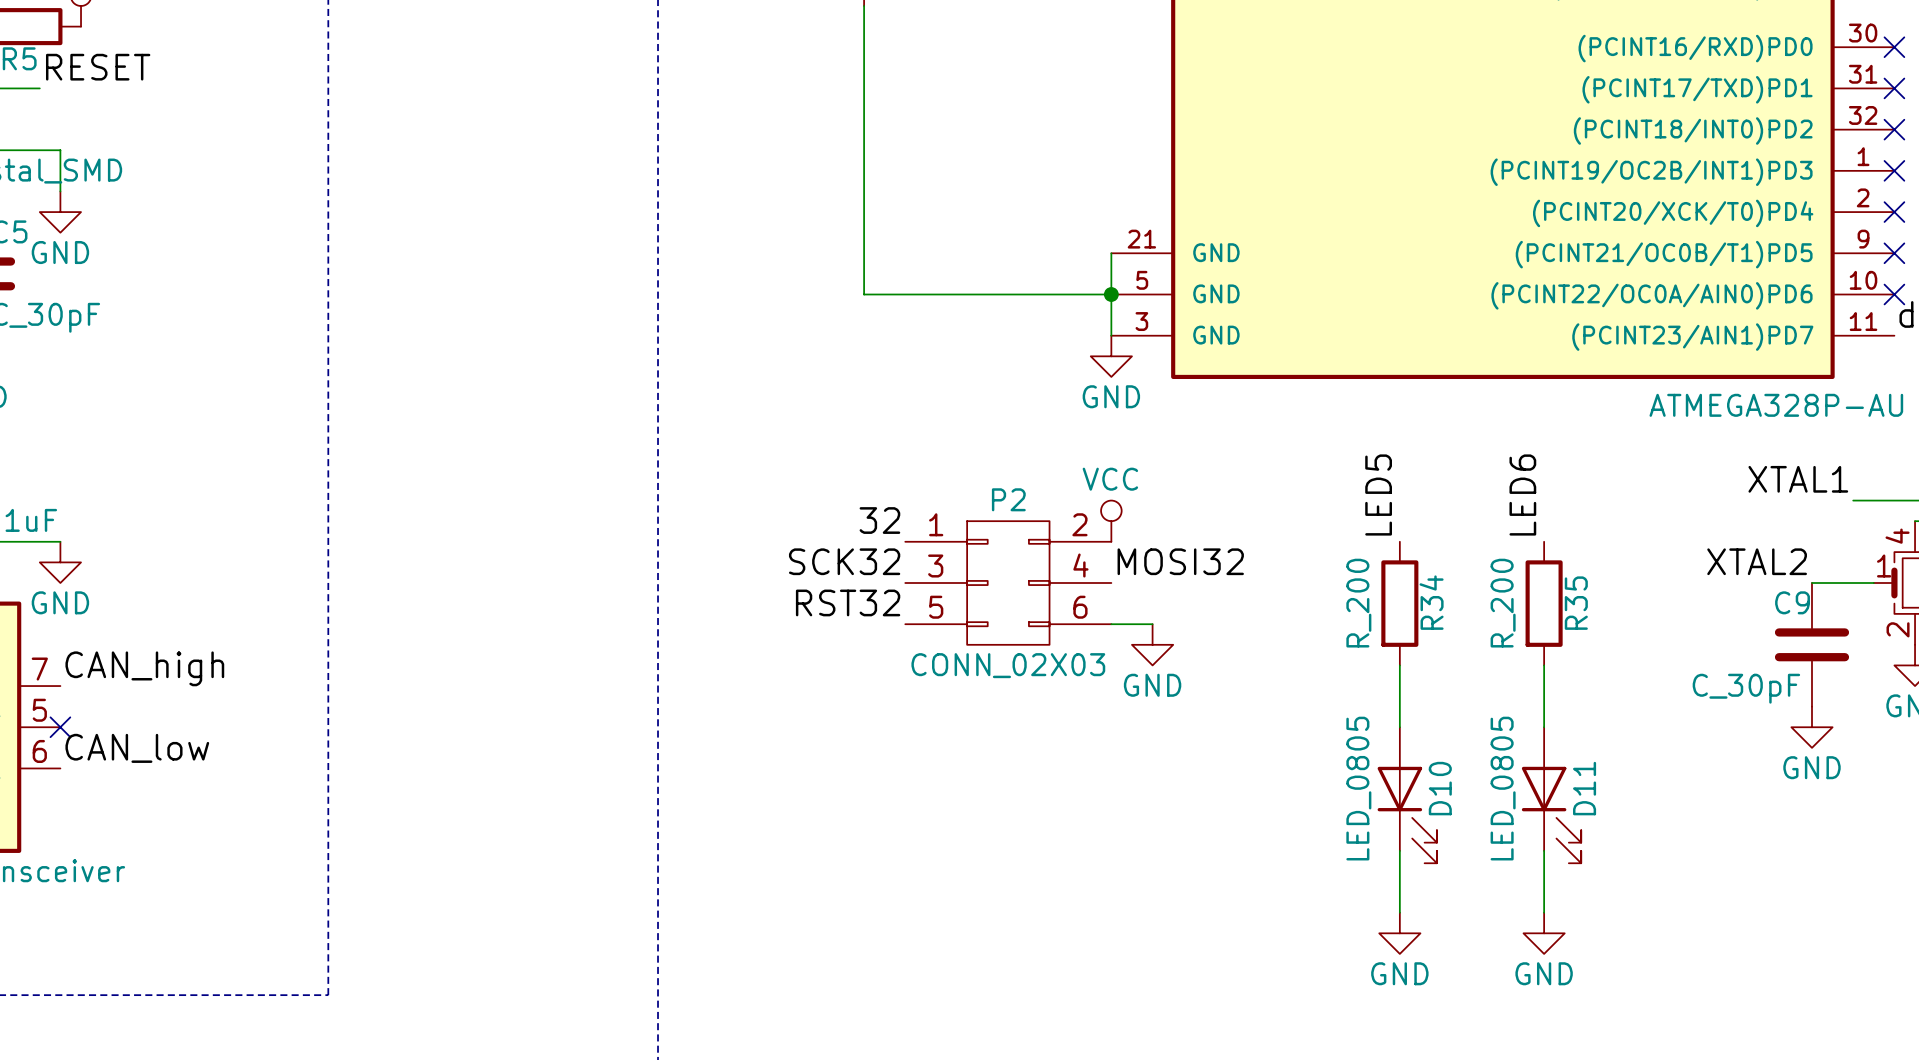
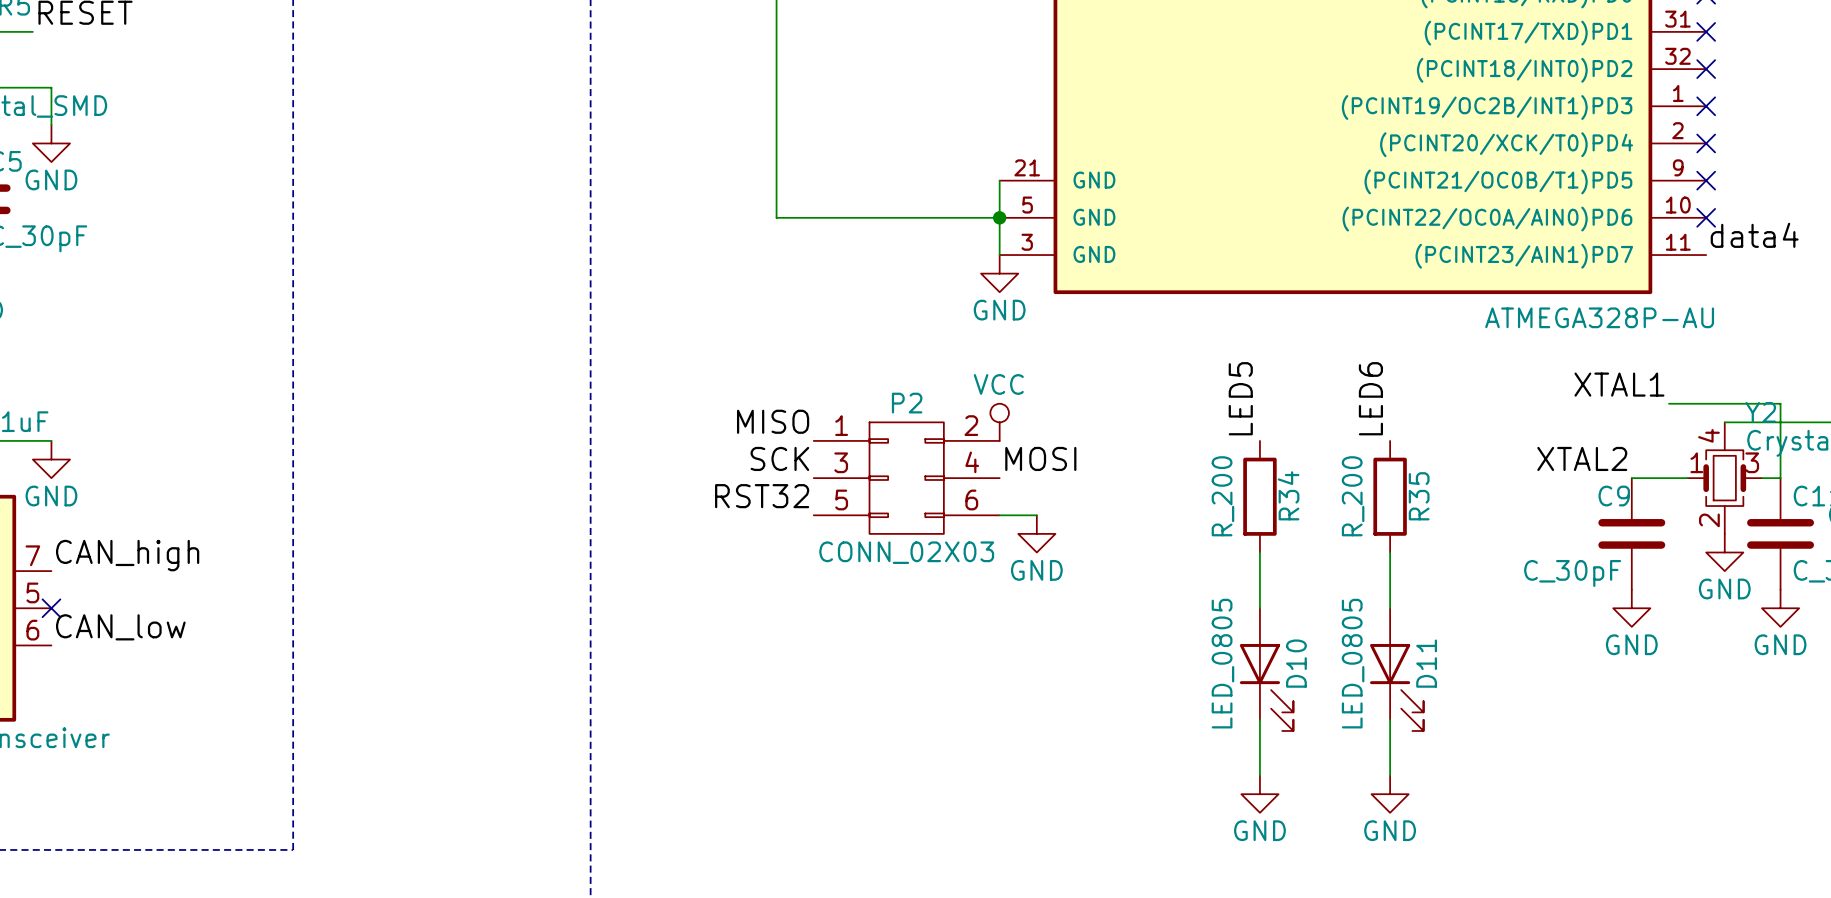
label: 32 (879, 520) -> MISO (773, 421)
label: SCK32 (844, 561) -> SCK (779, 458)
label: MOSI32 (1180, 561) -> MOSI (1040, 458)

